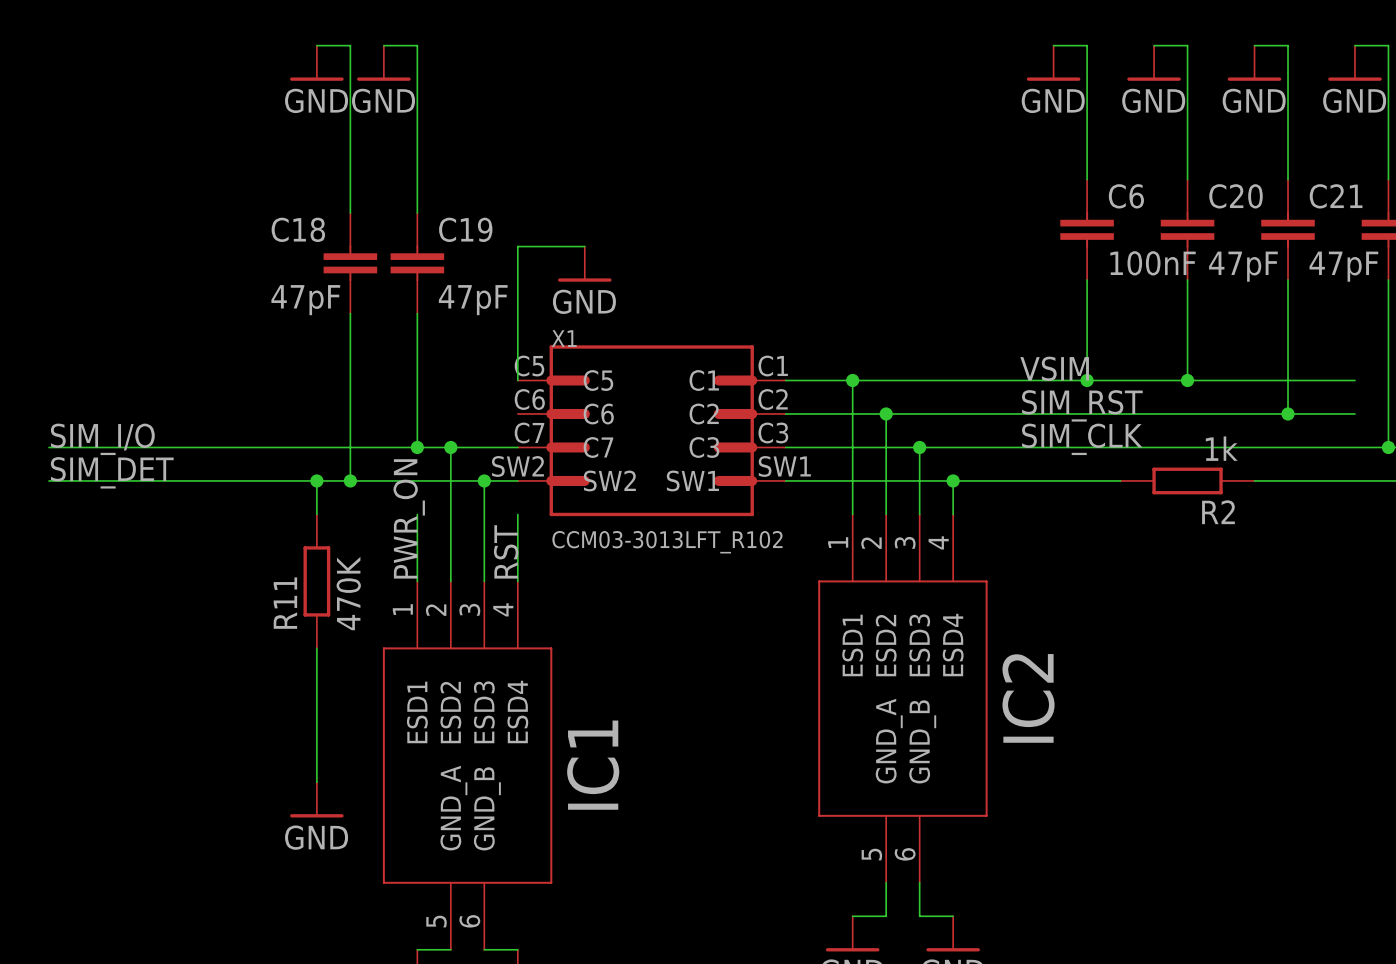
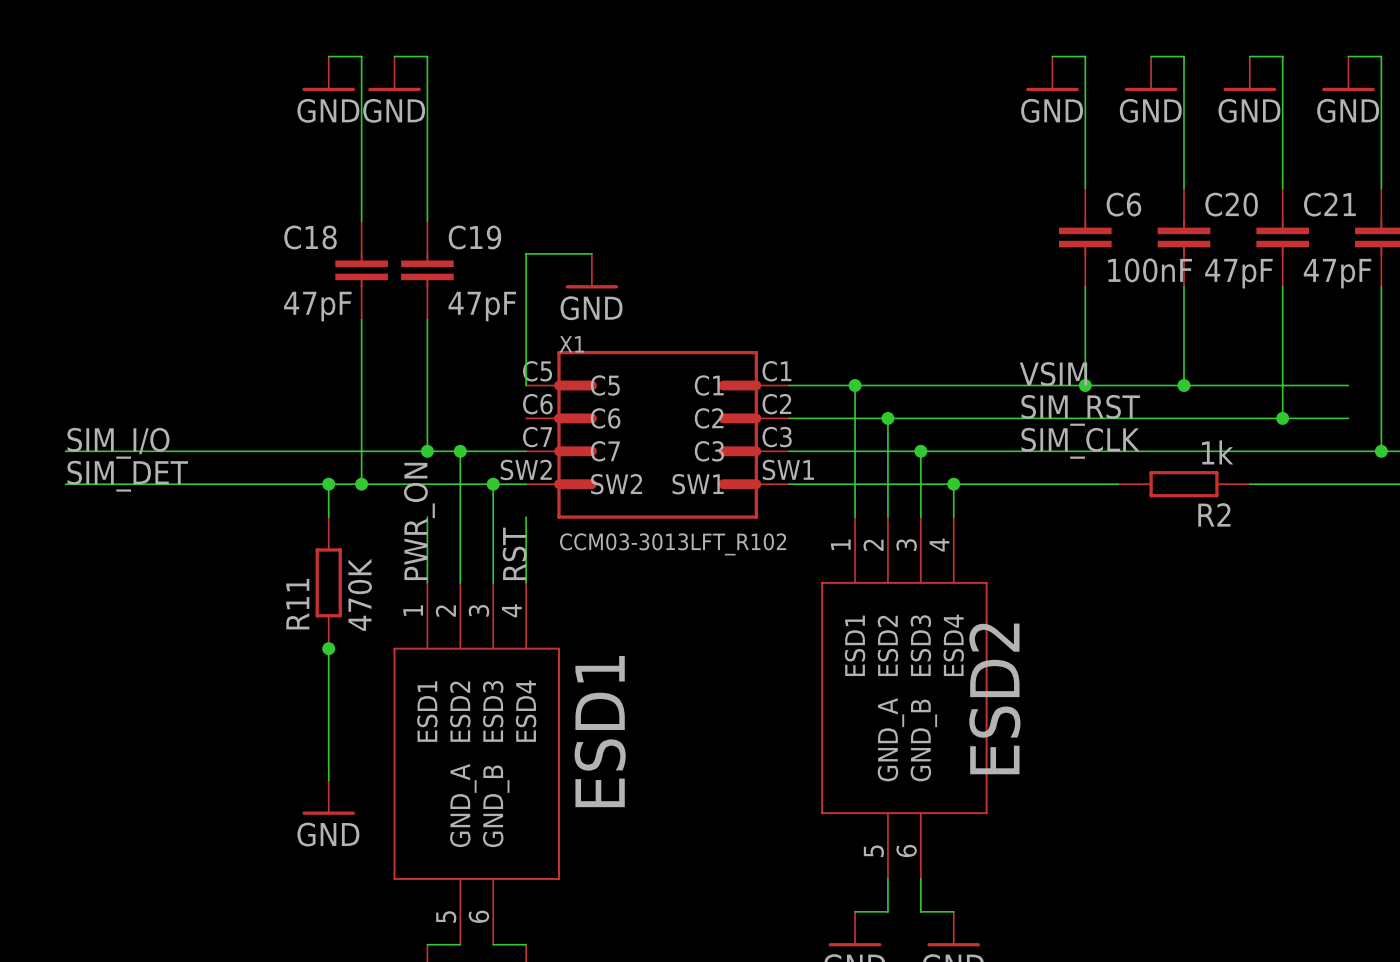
junction: none -> (328, 648)
text: IC2 (1028, 698) -> none
text: none -> ESD2 (994, 698)
text: IC1 (593, 765) -> ESD1 (600, 731)

